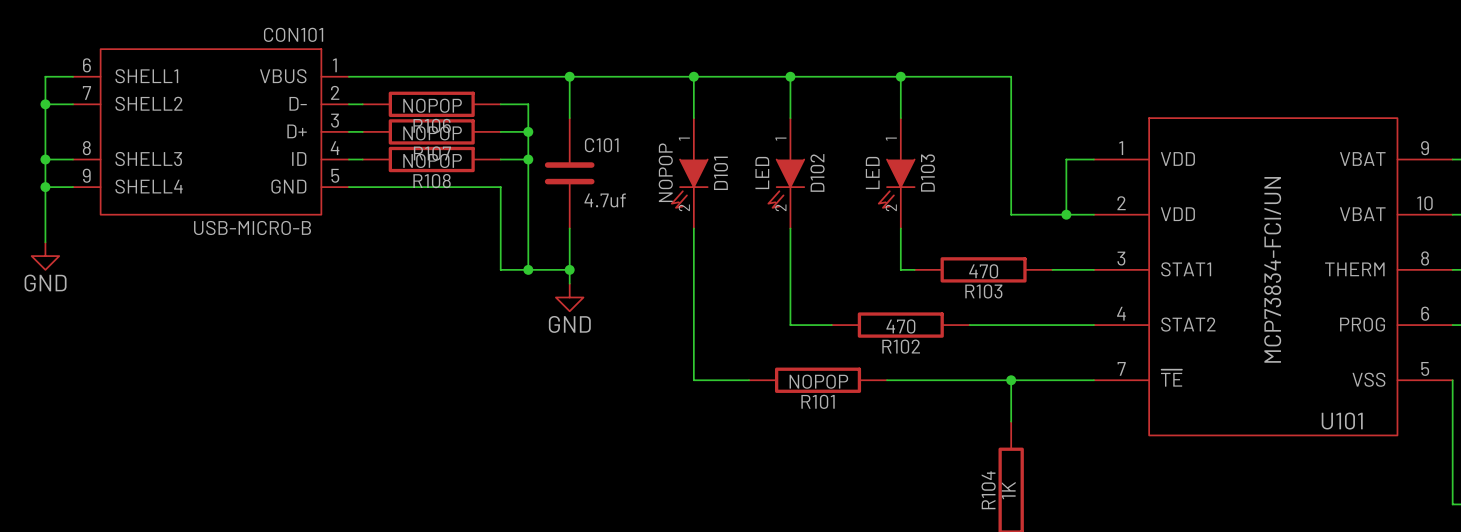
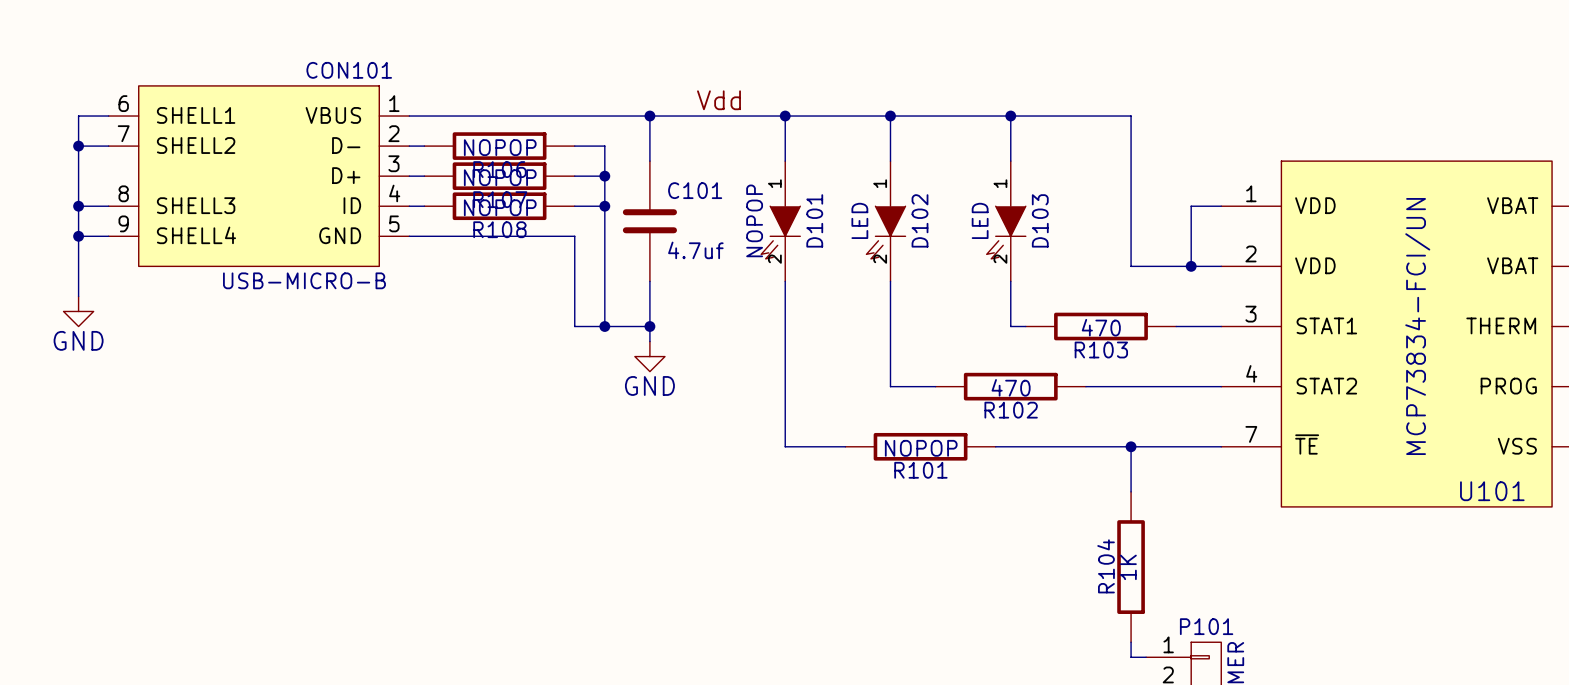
label: none -> Vdd (718, 100)

